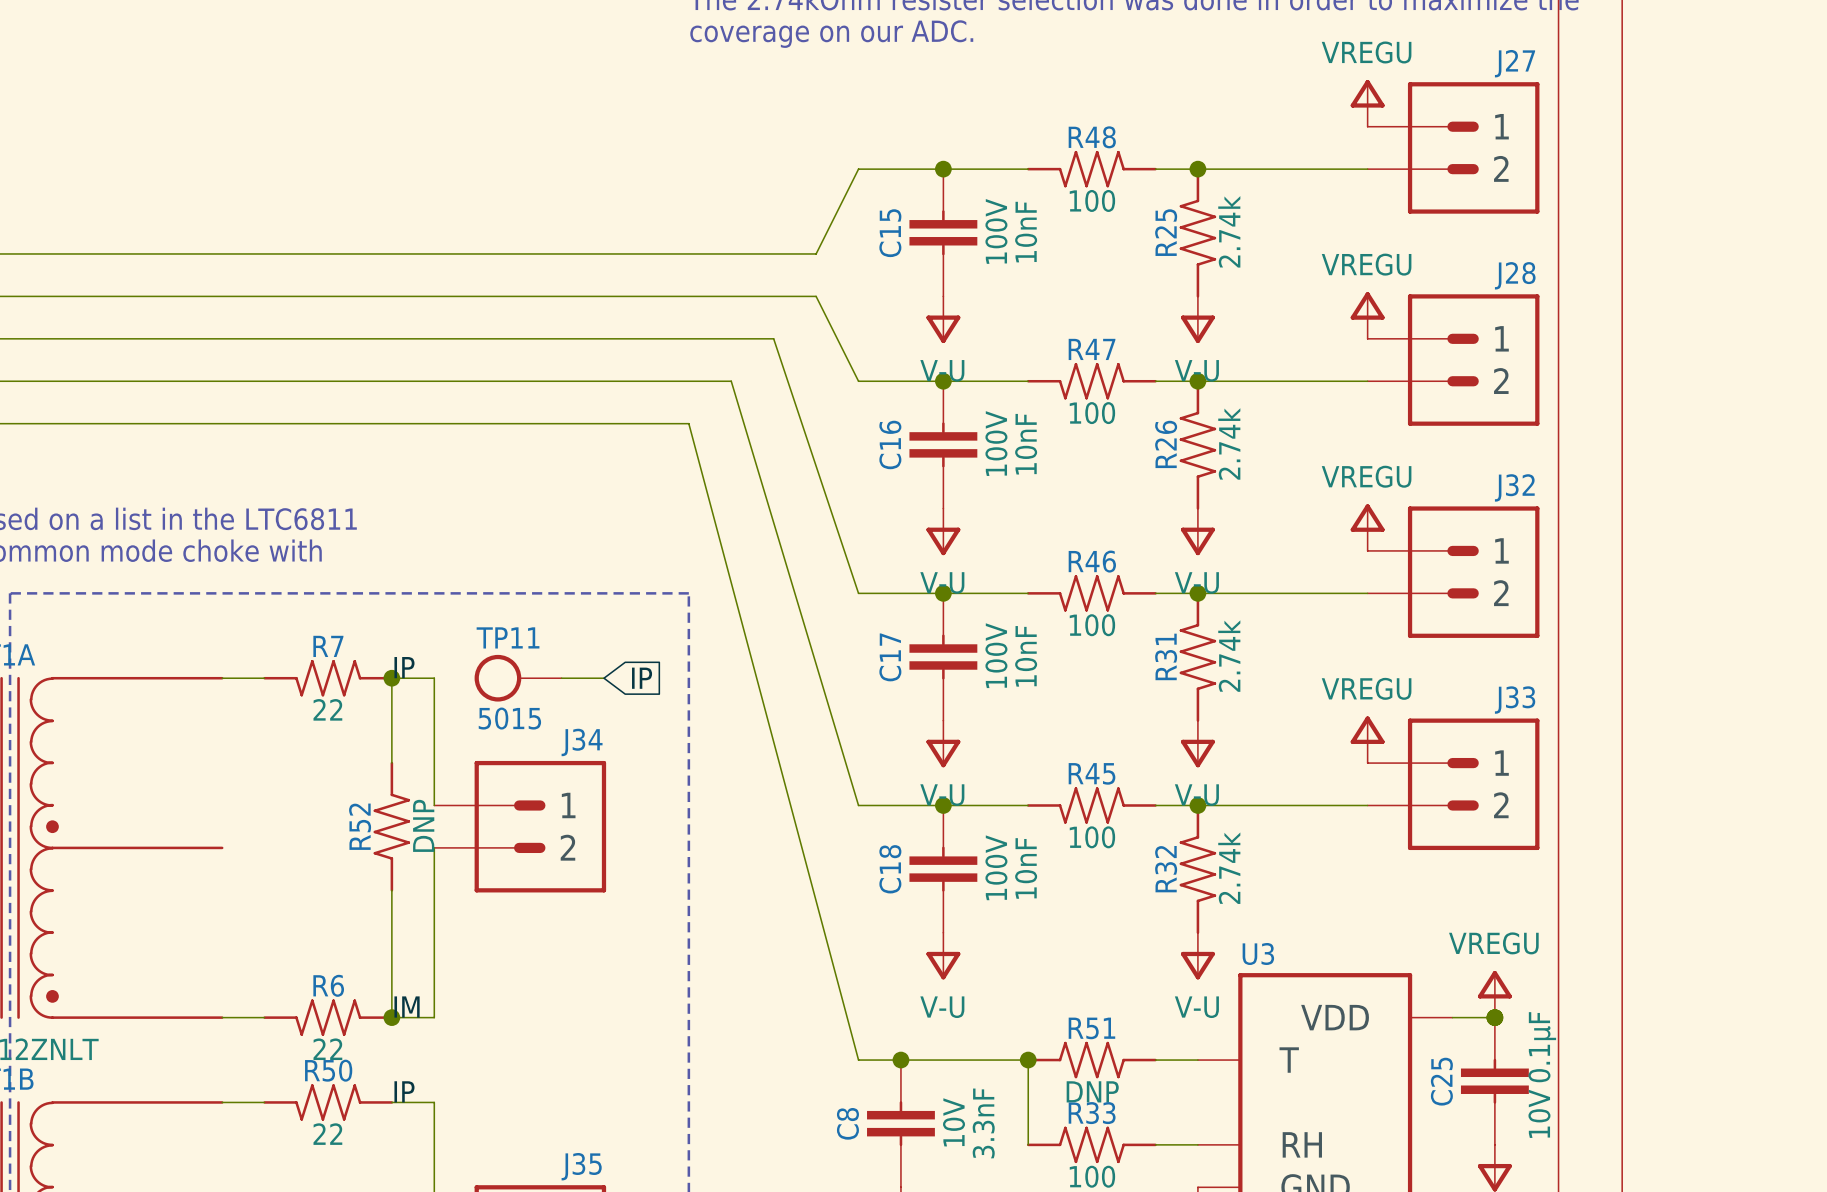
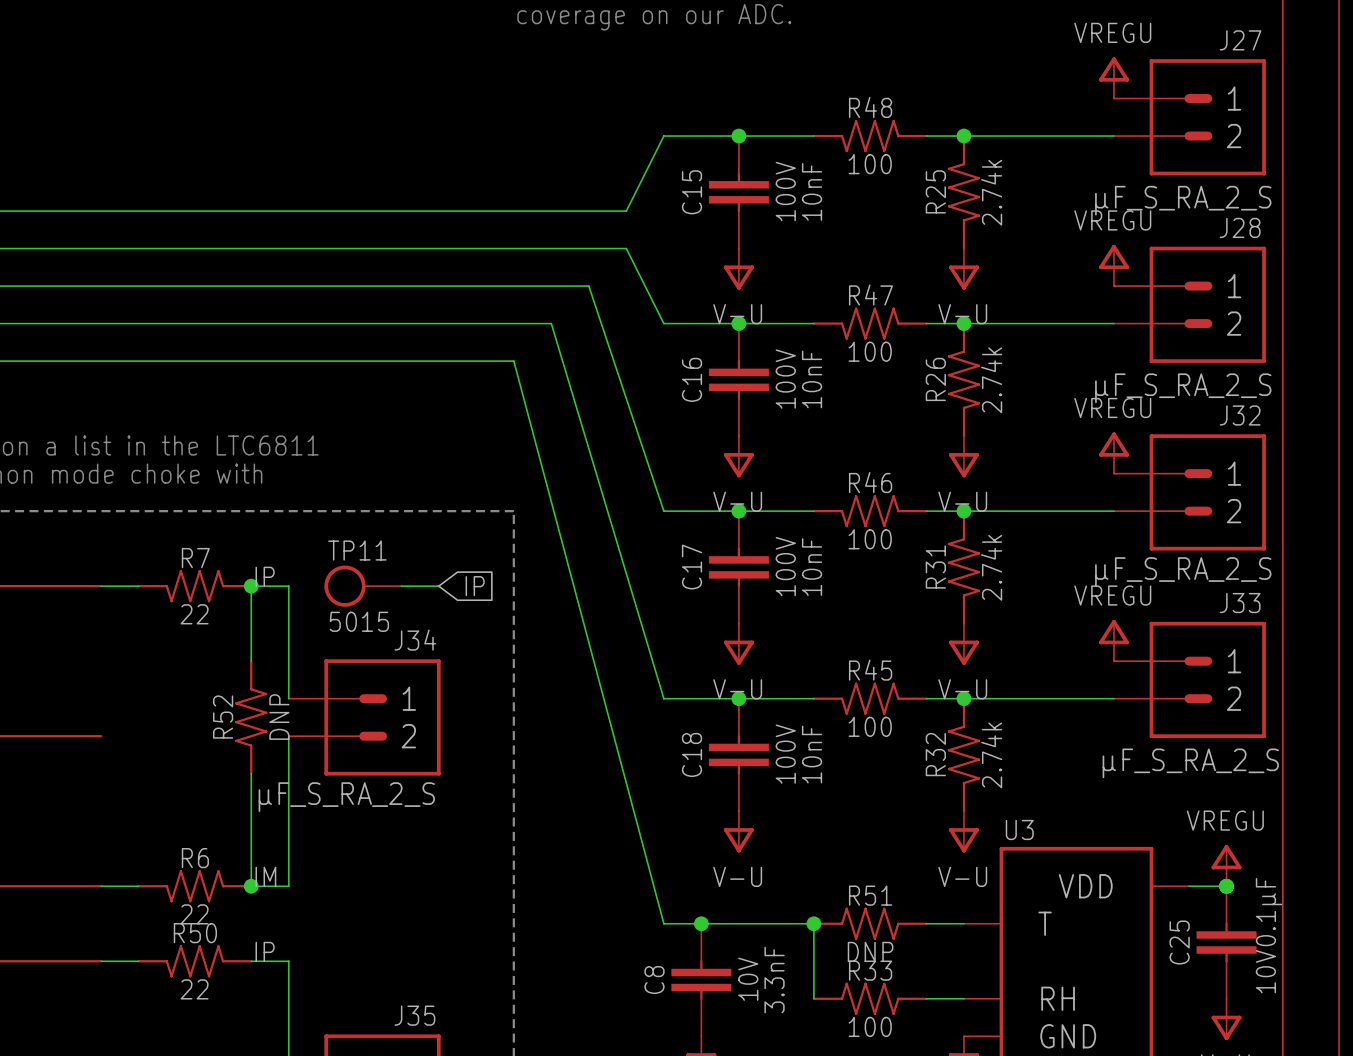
J27 text: none -> µF_S_RA_2_S (1183, 200)
J28 text: none -> µF_S_RA_2_S (1183, 388)
J32 text: none -> µF_S_RA_2_S (1183, 572)
J33 text: none -> µF_S_RA_2_S (1190, 763)
J34 text: none -> µF_S_RA_2_S (346, 797)

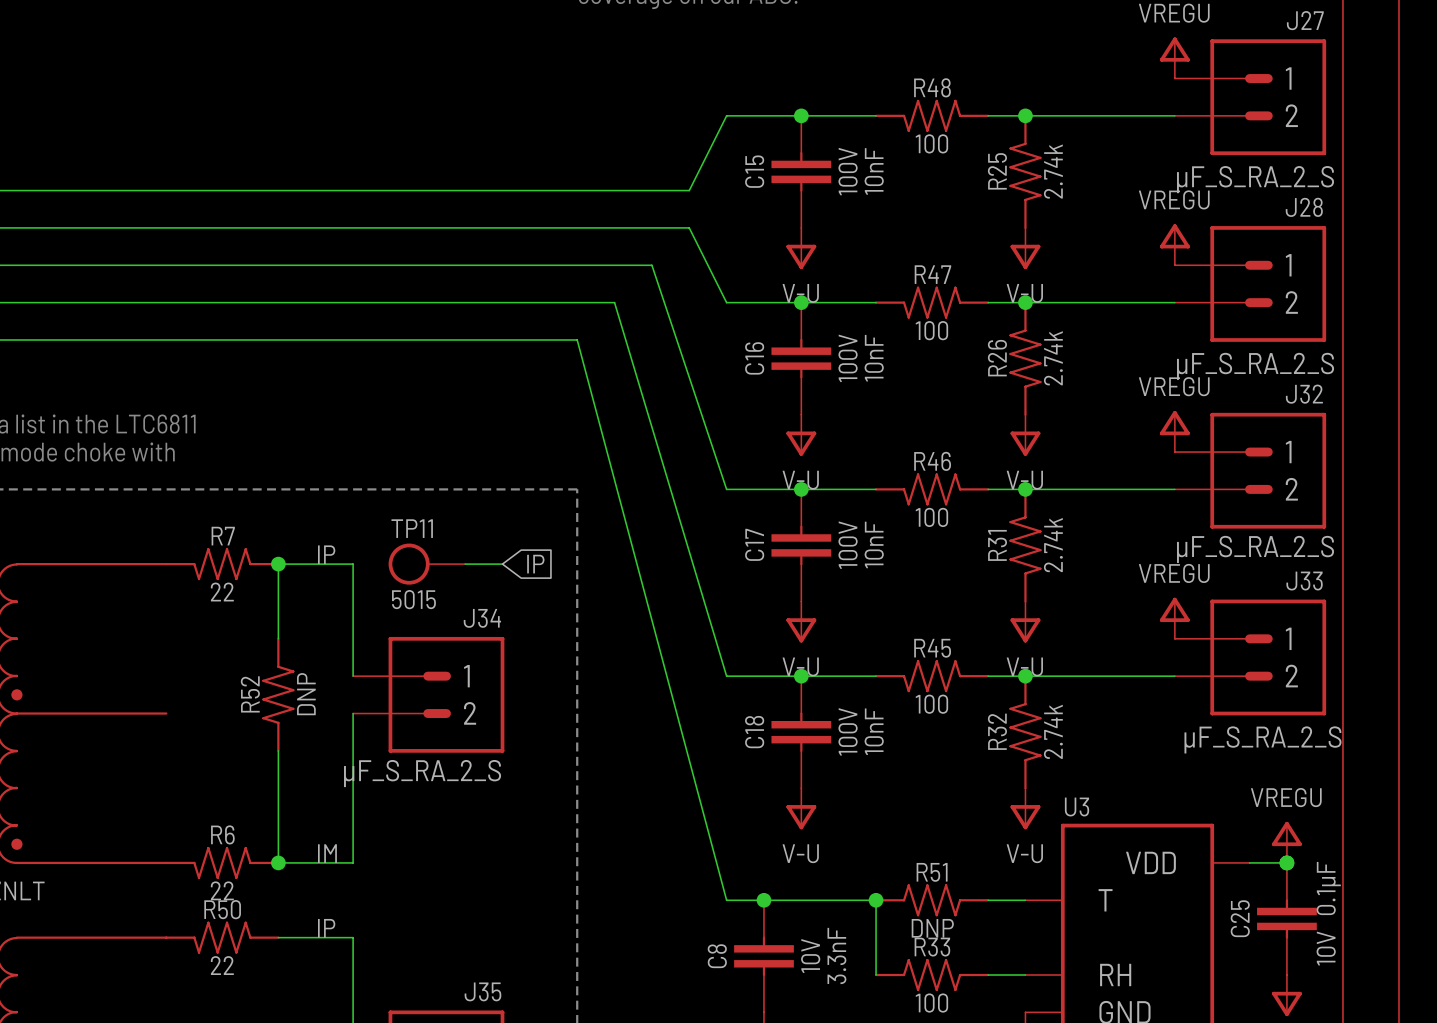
R7 position: (194, 586) -> (222, 564)
wire: (251, 586) (251, 661) -> (315, 564) (278, 564) (278, 638)
junction position: (251, 586) -> (278, 564)
R52 position: (251, 717) -> (278, 694)
wire: (251, 773) (251, 886) -> (278, 750) (278, 862) (315, 862)
R6 position: (194, 886) -> (222, 862)
junction position: (251, 886) -> (278, 862)
R50 position: (194, 961) -> (222, 937)

